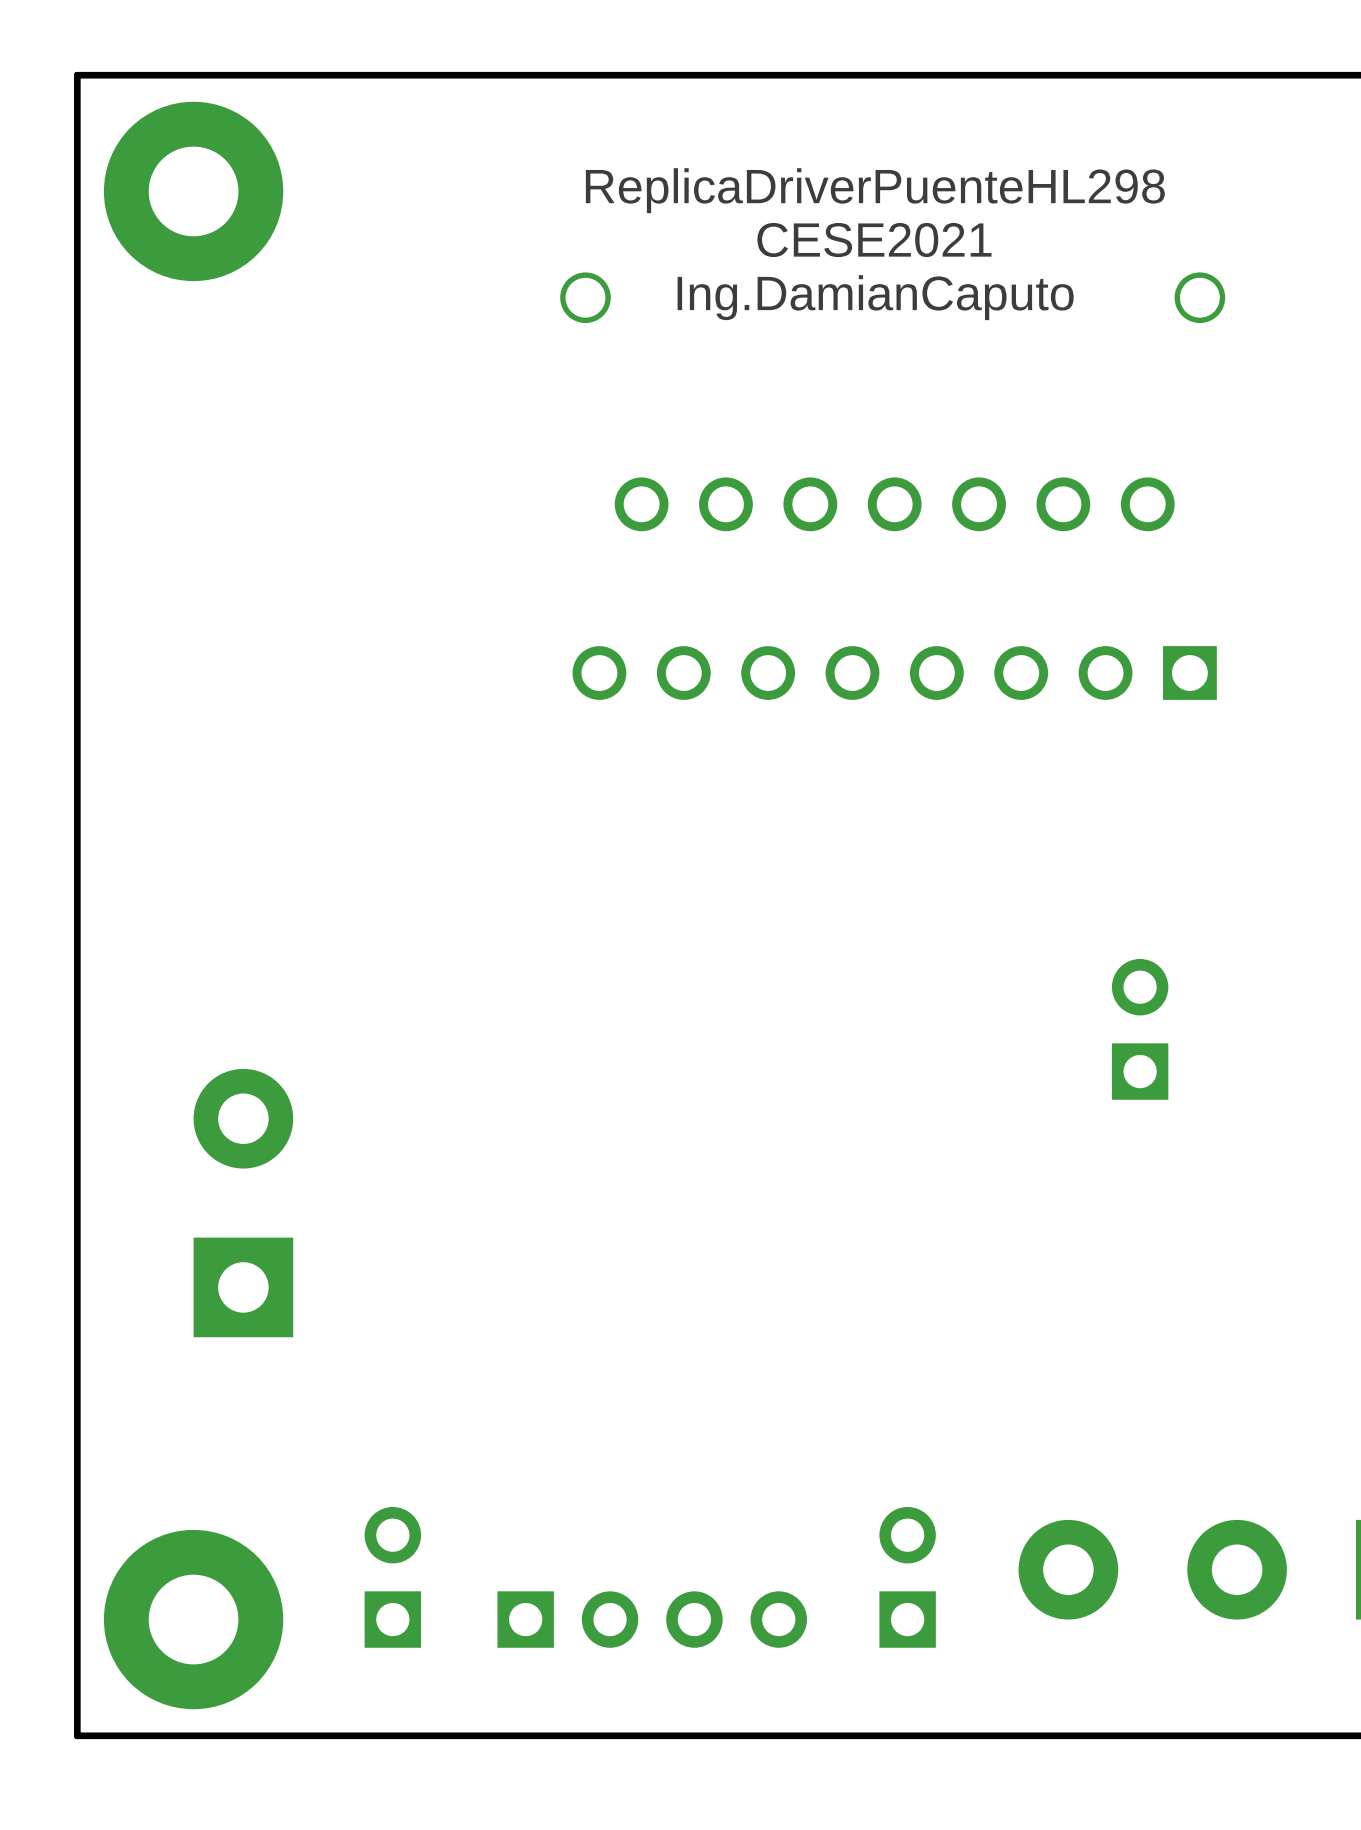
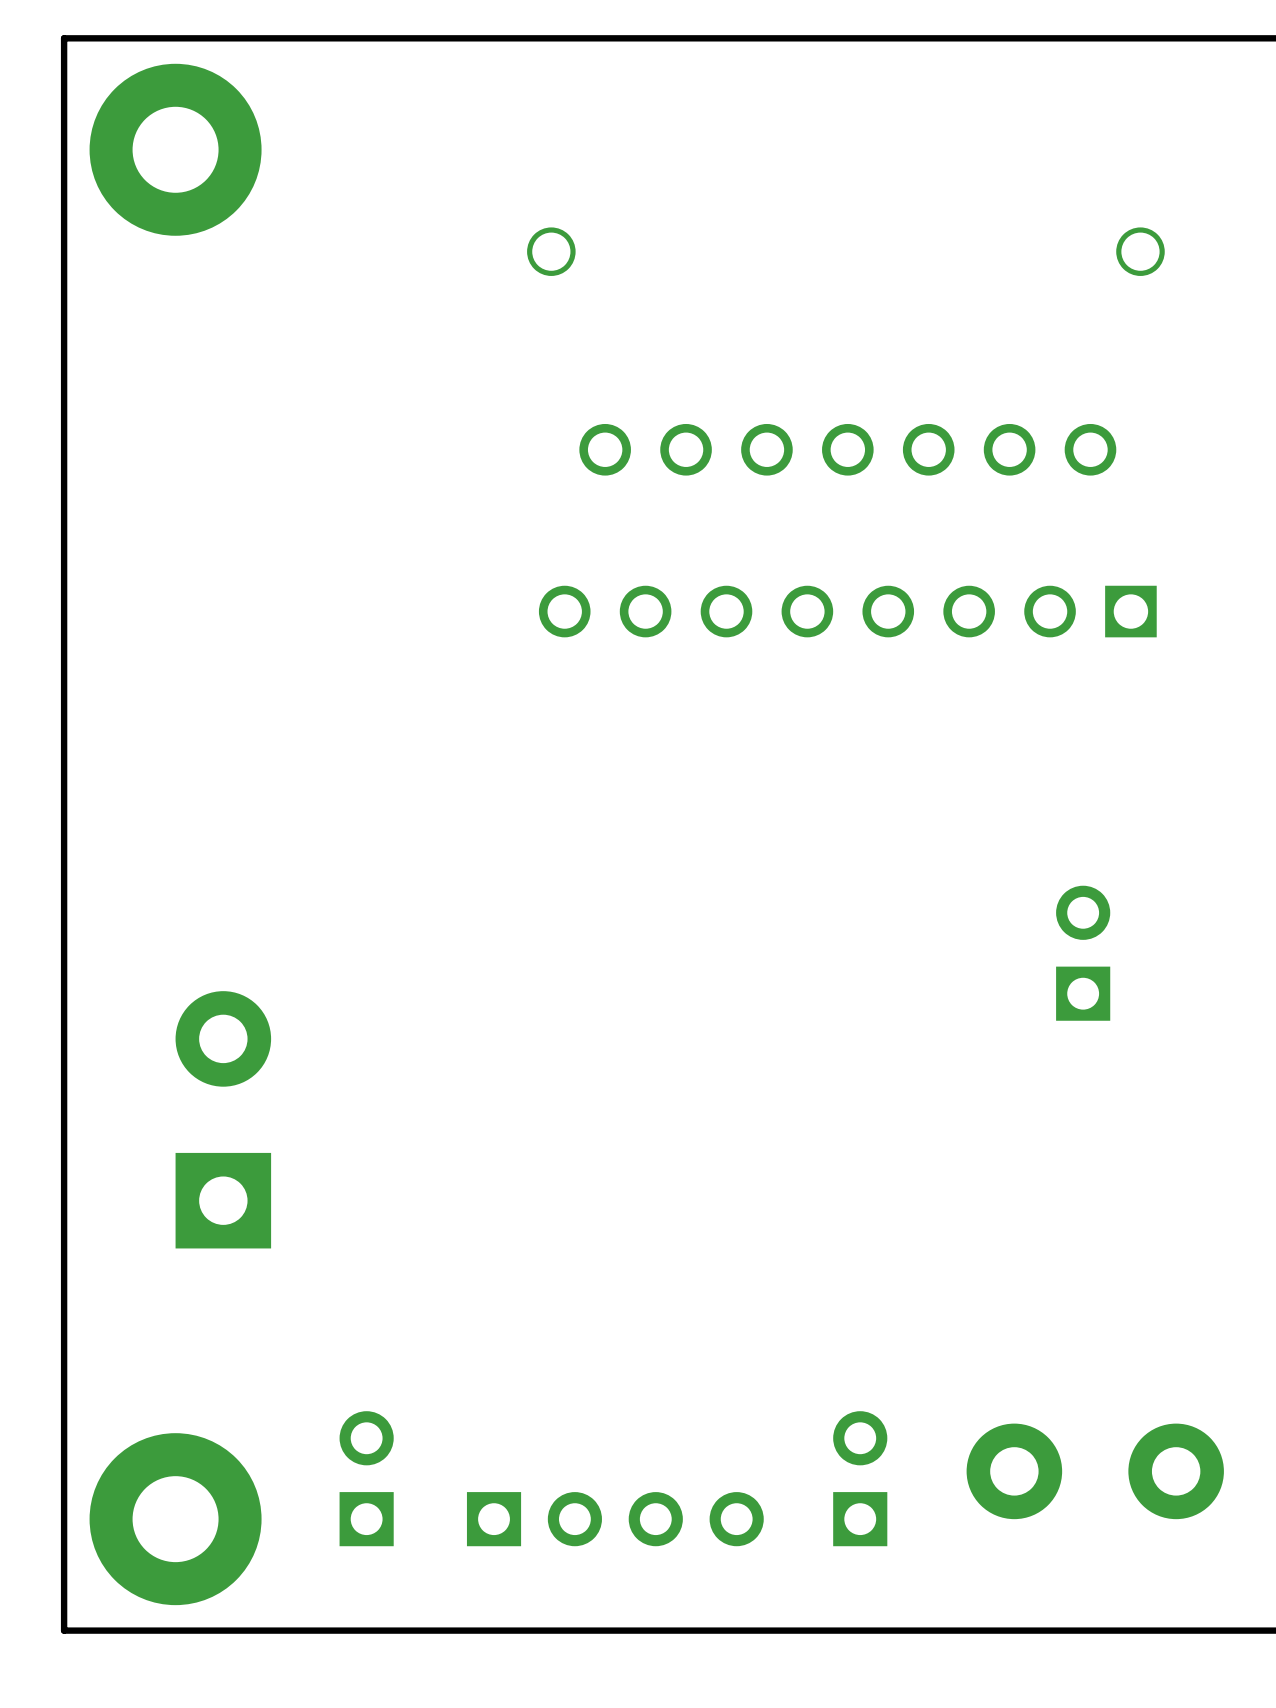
text: ReplicaDriverPuenteHL298 (875, 190) -> none
text: CESE2021 (874, 240) -> none
text: Ing.DamianCaputo (875, 297) -> none

